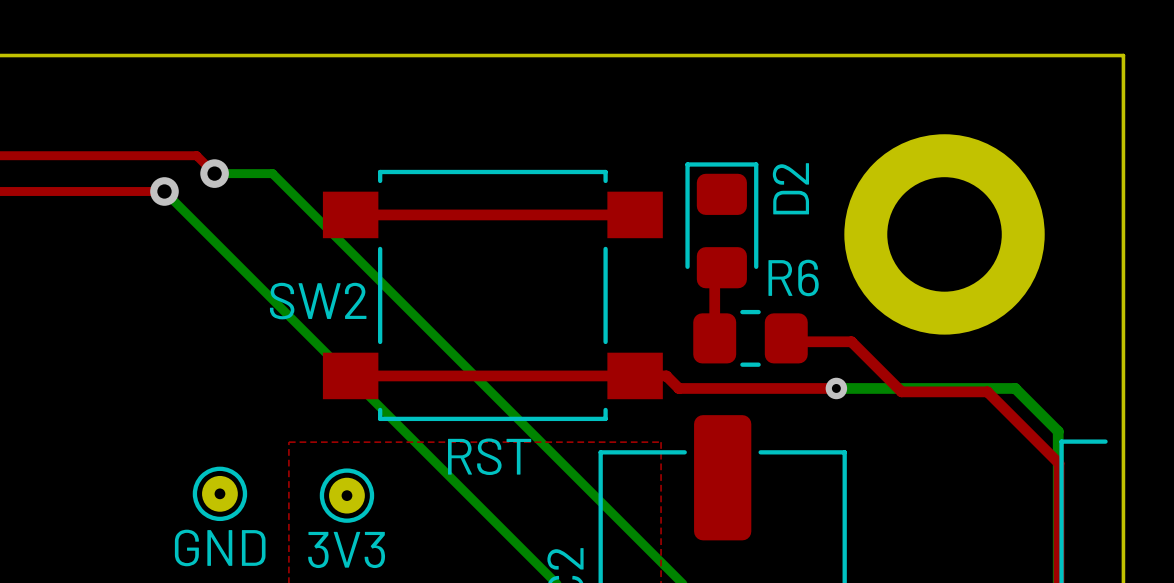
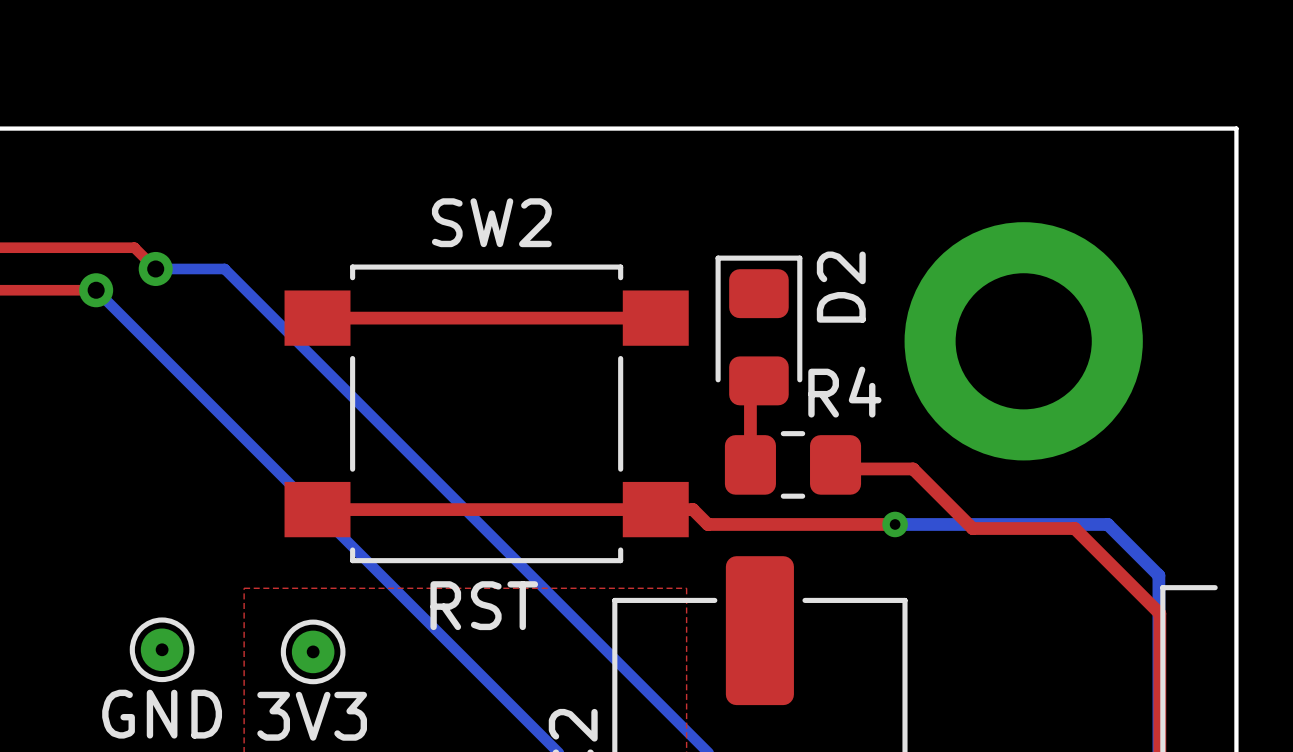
R6 name: R6 (793, 277) -> R4 (844, 392)
SW2 name position: SW2 (318, 301) -> SW2 (491, 222)

